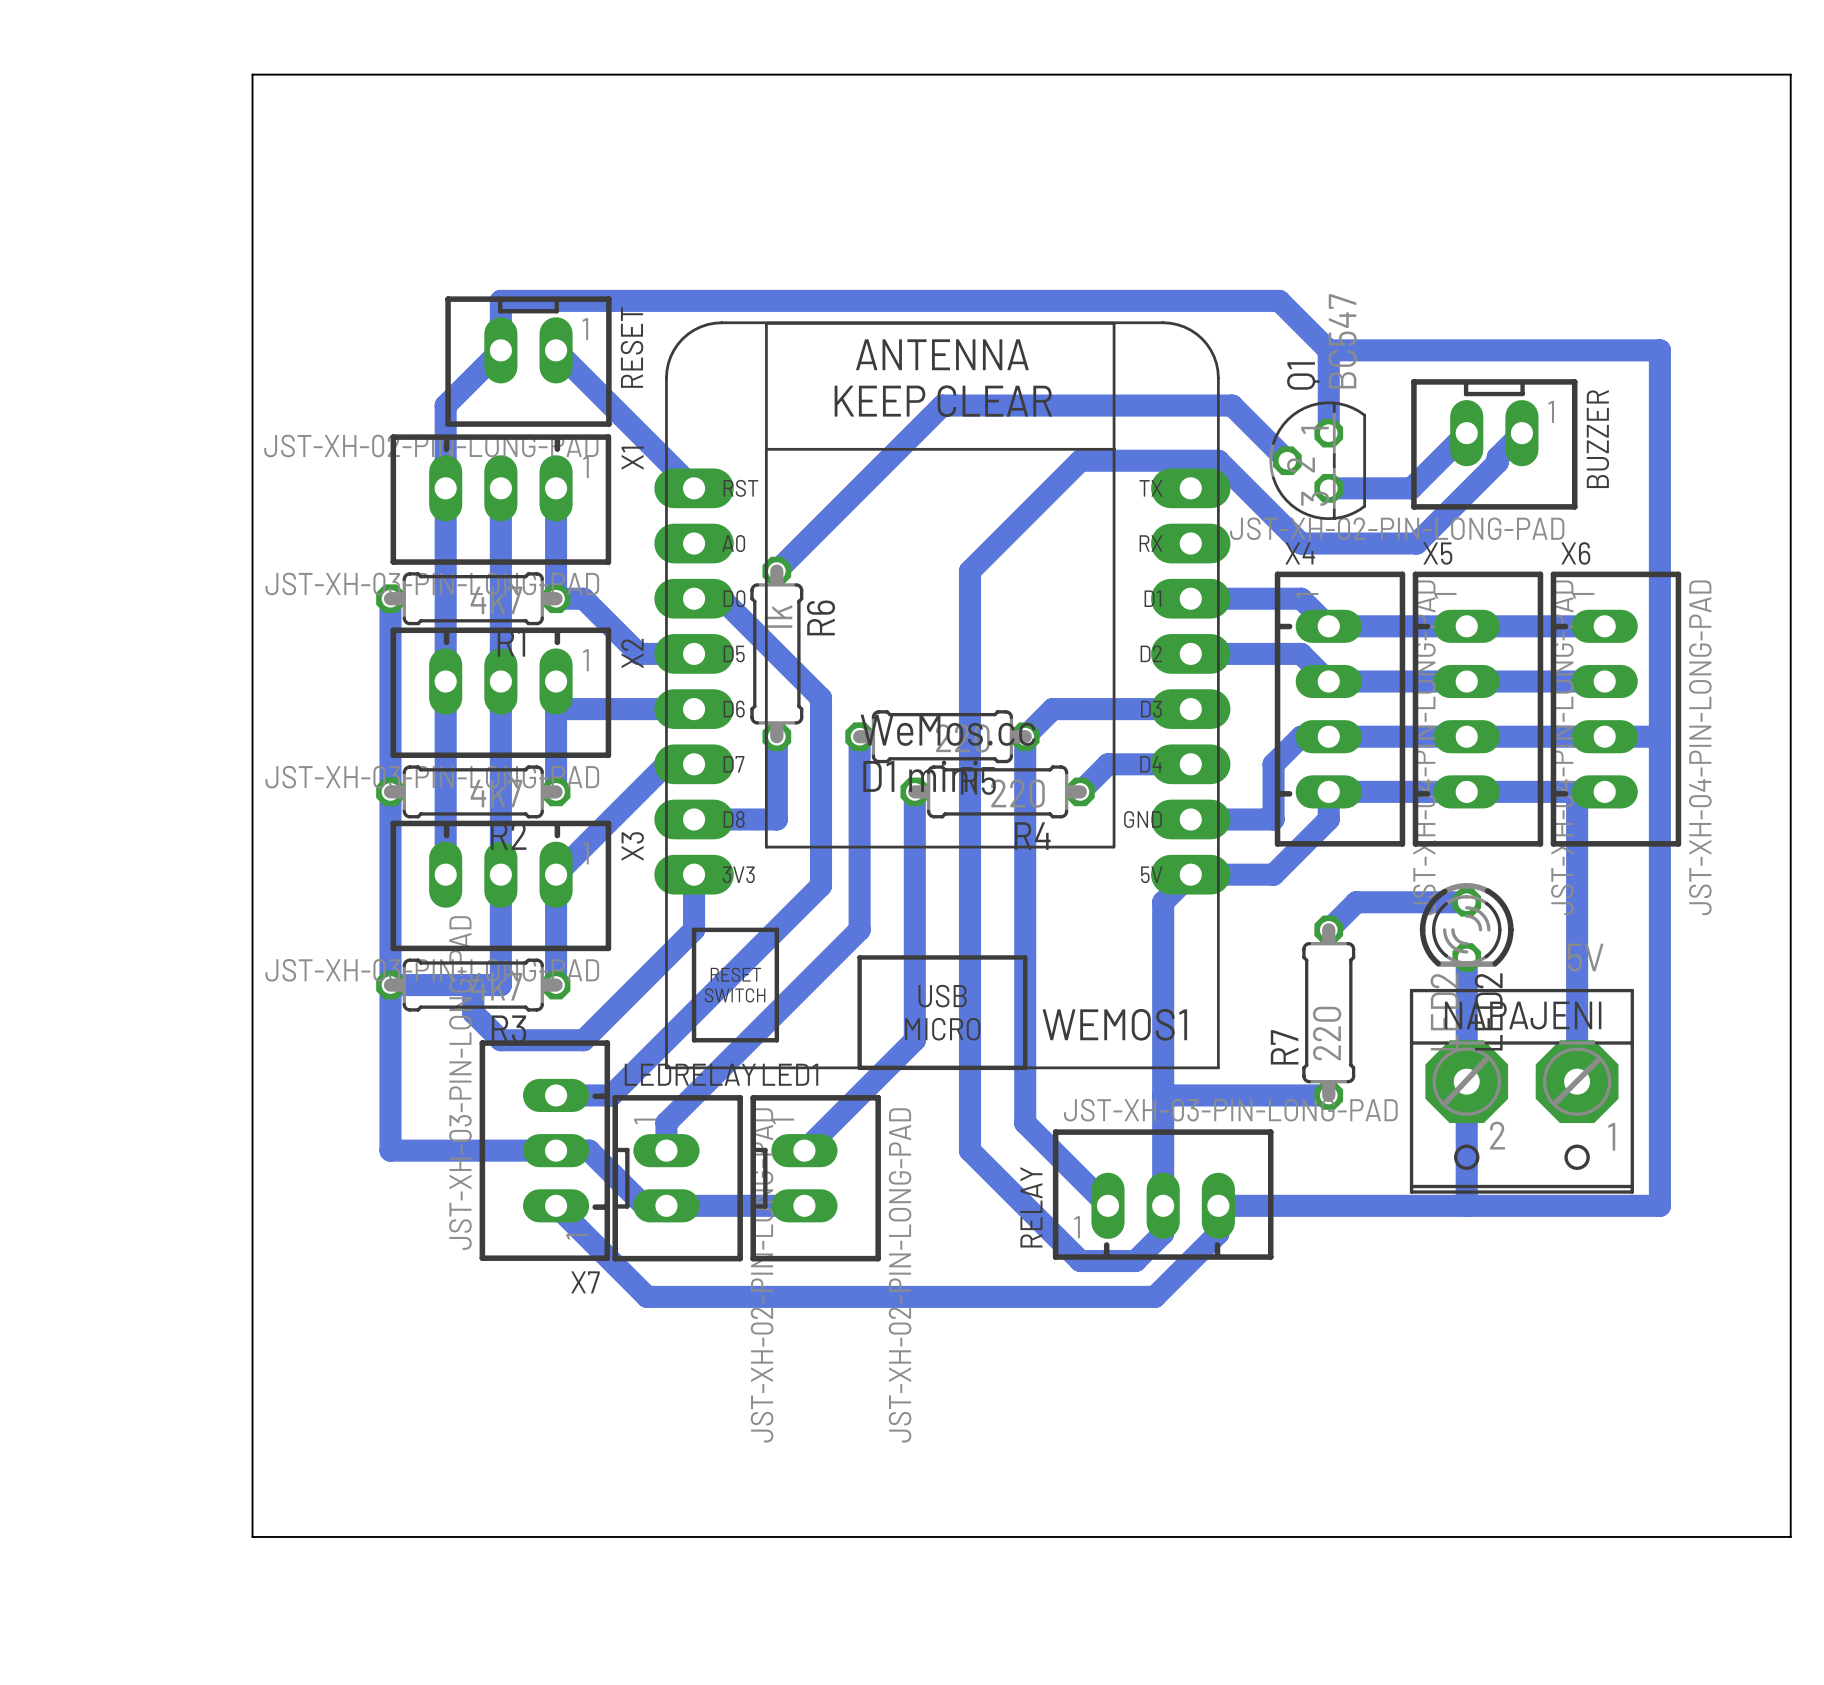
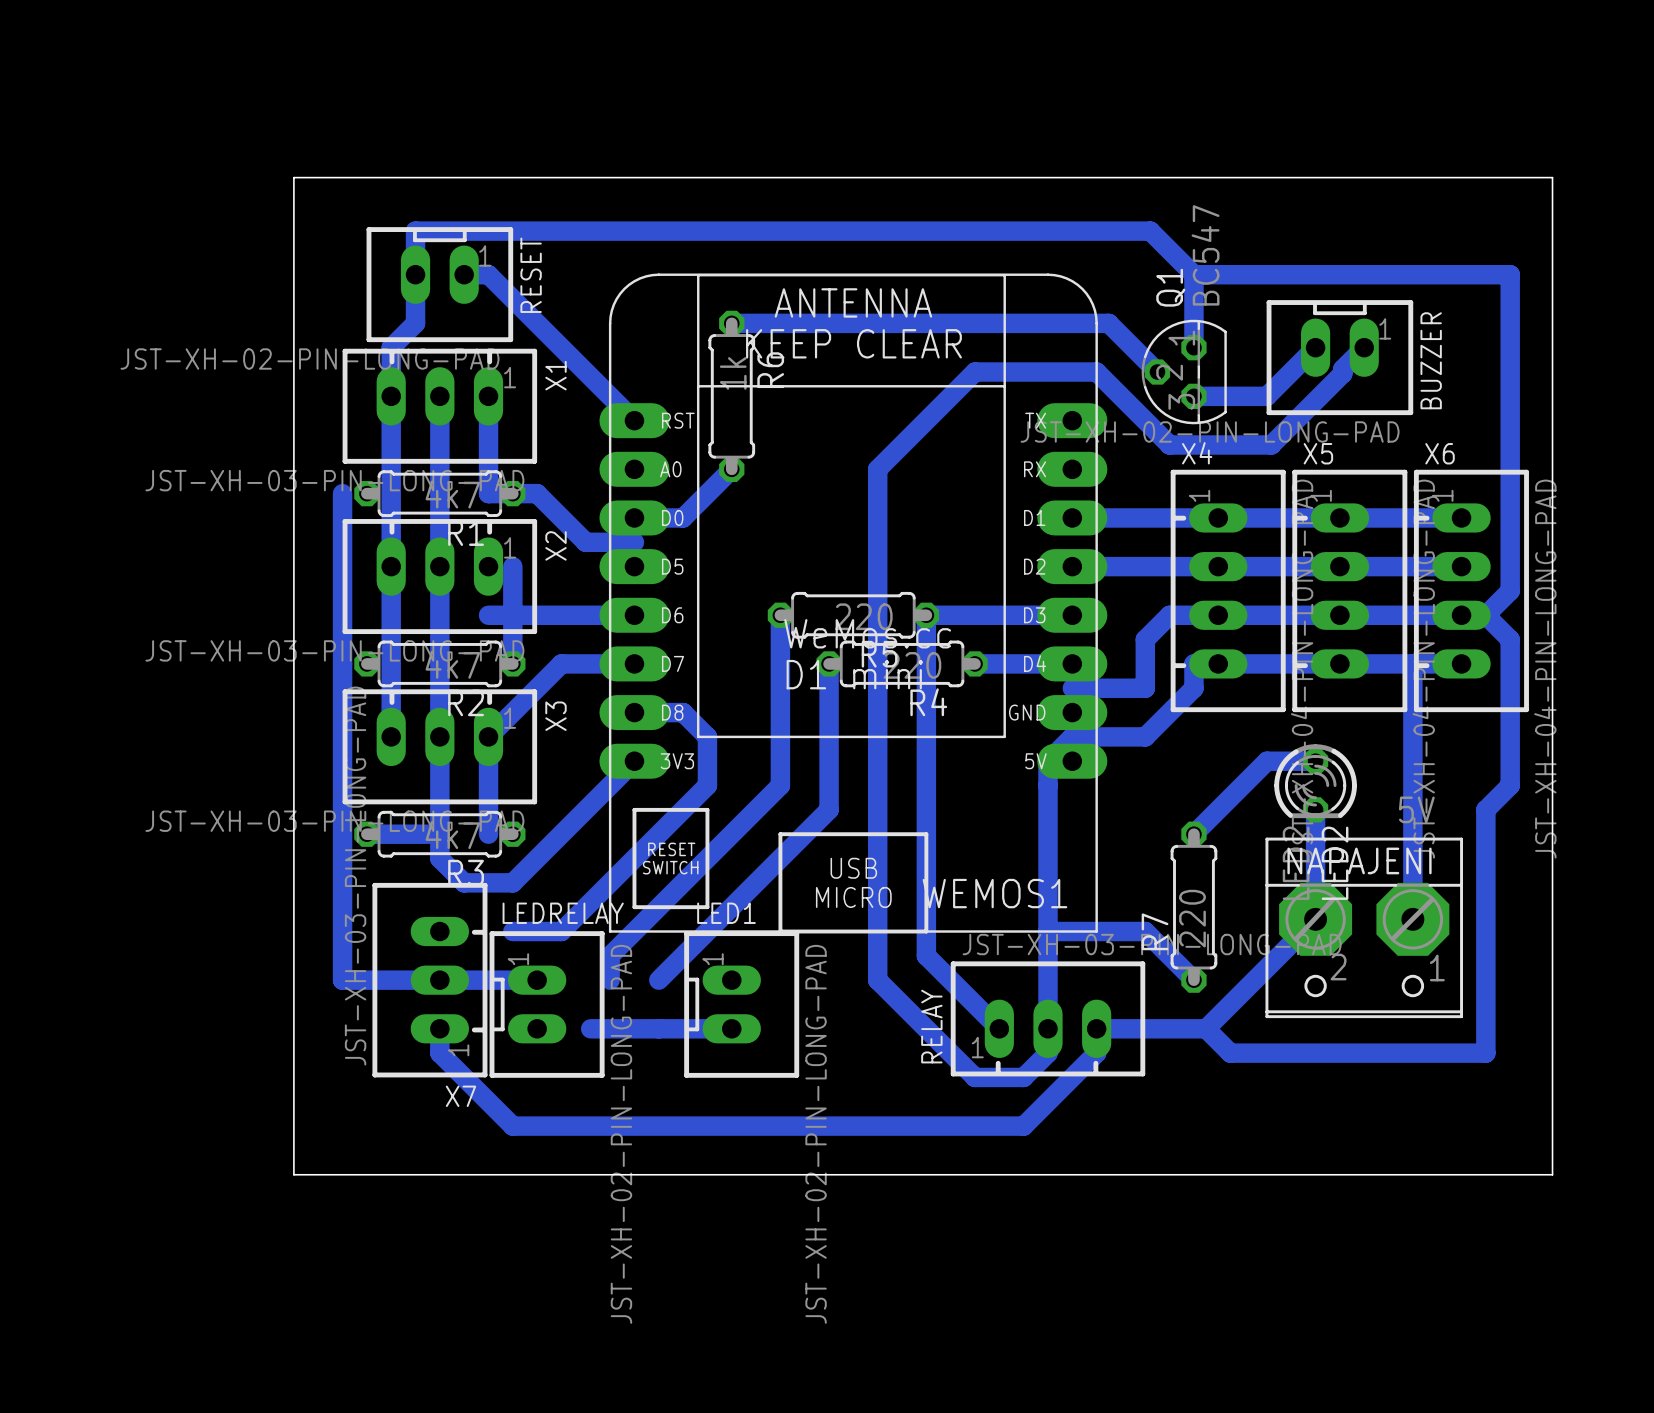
board edge: (252, 74) (1790, 74) (1790, 1536) (252, 1536) (252, 74) -> (293, 177) (293, 1174) (1552, 1174) (1552, 177) (293, 177)
bottom track: (500, 300) (500, 350) (445, 405) (445, 874) -> (464, 231) (415, 231) (415, 323) (391, 347) (391, 736)
bottom track: none -> (464, 274) (488, 274) (634, 420)
bottom track: (556, 350) (694, 488) -> none
bottom track: (1659, 350) (1659, 957) -> (1485, 274) (1510, 274) (1510, 590) (1485, 615) (1510, 639) (1510, 785) (1485, 809)
RESET position: (528, 361) -> (439, 284)
bottom track: (942, 405) (776, 571) -> (853, 323) (731, 323)
bottom track: (500, 488) (500, 985) (473, 985) -> (439, 396) (439, 834)
bottom track: (556, 488) (556, 598) -> (488, 396) (488, 493) (512, 493)
X1 position: (500, 499) -> (439, 406)
bottom track: none -> (731, 469) (683, 517) (634, 517)
bottom track: (390, 598) (390, 1150) -> (342, 493) (342, 980) (366, 980)
bottom track: (694, 598) (721, 598) (820, 698) (820, 885) (776, 929) -> (634, 712) (683, 712) (707, 736) (707, 785)
bottom track: (1190, 598) (1301, 598) (1328, 626) -> (1072, 517) (1193, 517)
R6 position: (776, 653) -> (731, 396)
bottom track: (1190, 653) (1301, 653) (1328, 681) -> (1072, 566) (1193, 566)
X2 position: (500, 692) -> (439, 576)
WEMOS1 position: (942, 695) -> (853, 603)
bottom track: (556, 709) (694, 709) -> none
bottom track: (1190, 709) (1052, 709) (1025, 736) -> (1072, 615) (926, 615)
X4 position: (1340, 709) -> (1228, 590)
X5 position: (1477, 709) -> (1349, 590)
X6 position: (1615, 709) -> (1471, 590)
bottom track: none -> (488, 615) (634, 615)
bottom track: (776, 736) (776, 819) (694, 819) -> none
bottom track: (694, 764) (666, 764) (556, 874) (556, 985) -> none
bottom track: (1190, 764) (1107, 764) (1080, 791) -> (1072, 663) (975, 663)
bottom track: none -> (634, 663) (561, 663) (488, 736) (488, 834)
bottom track: (694, 874) (694, 929) (583, 1040) (556, 1040) -> (634, 761) (512, 882)
X3 position: (500, 885) -> (439, 746)
bottom track: (1411, 902) (1356, 902) (1328, 929) -> (1266, 761) (1193, 834)
bottom track: (914, 957) (914, 1040) (804, 1150) -> (829, 809) (658, 980)
R7 position: (1328, 1012) -> (1193, 907)
bottom track: (1466, 1081) (1466, 1205) -> none
bottom track: (1273, 1095) (1328, 1095) -> (1145, 931) (1193, 980)
X7 position: (544, 1150) -> (429, 980)
bottom track: (589, 1150) (644, 1205) -> none
LEDRELAY position: (677, 1178) -> (547, 1004)
bottom track: (556, 1205) (647, 1296) (1154, 1296) -> (439, 1028) (439, 1053) (512, 1126) (1023, 1126) (1040, 1109)
bottom track: (1342, 1205) (1659, 1205) -> (1315, 919) (1206, 1028) (1230, 1053) (1485, 1053) (1485, 1028)

